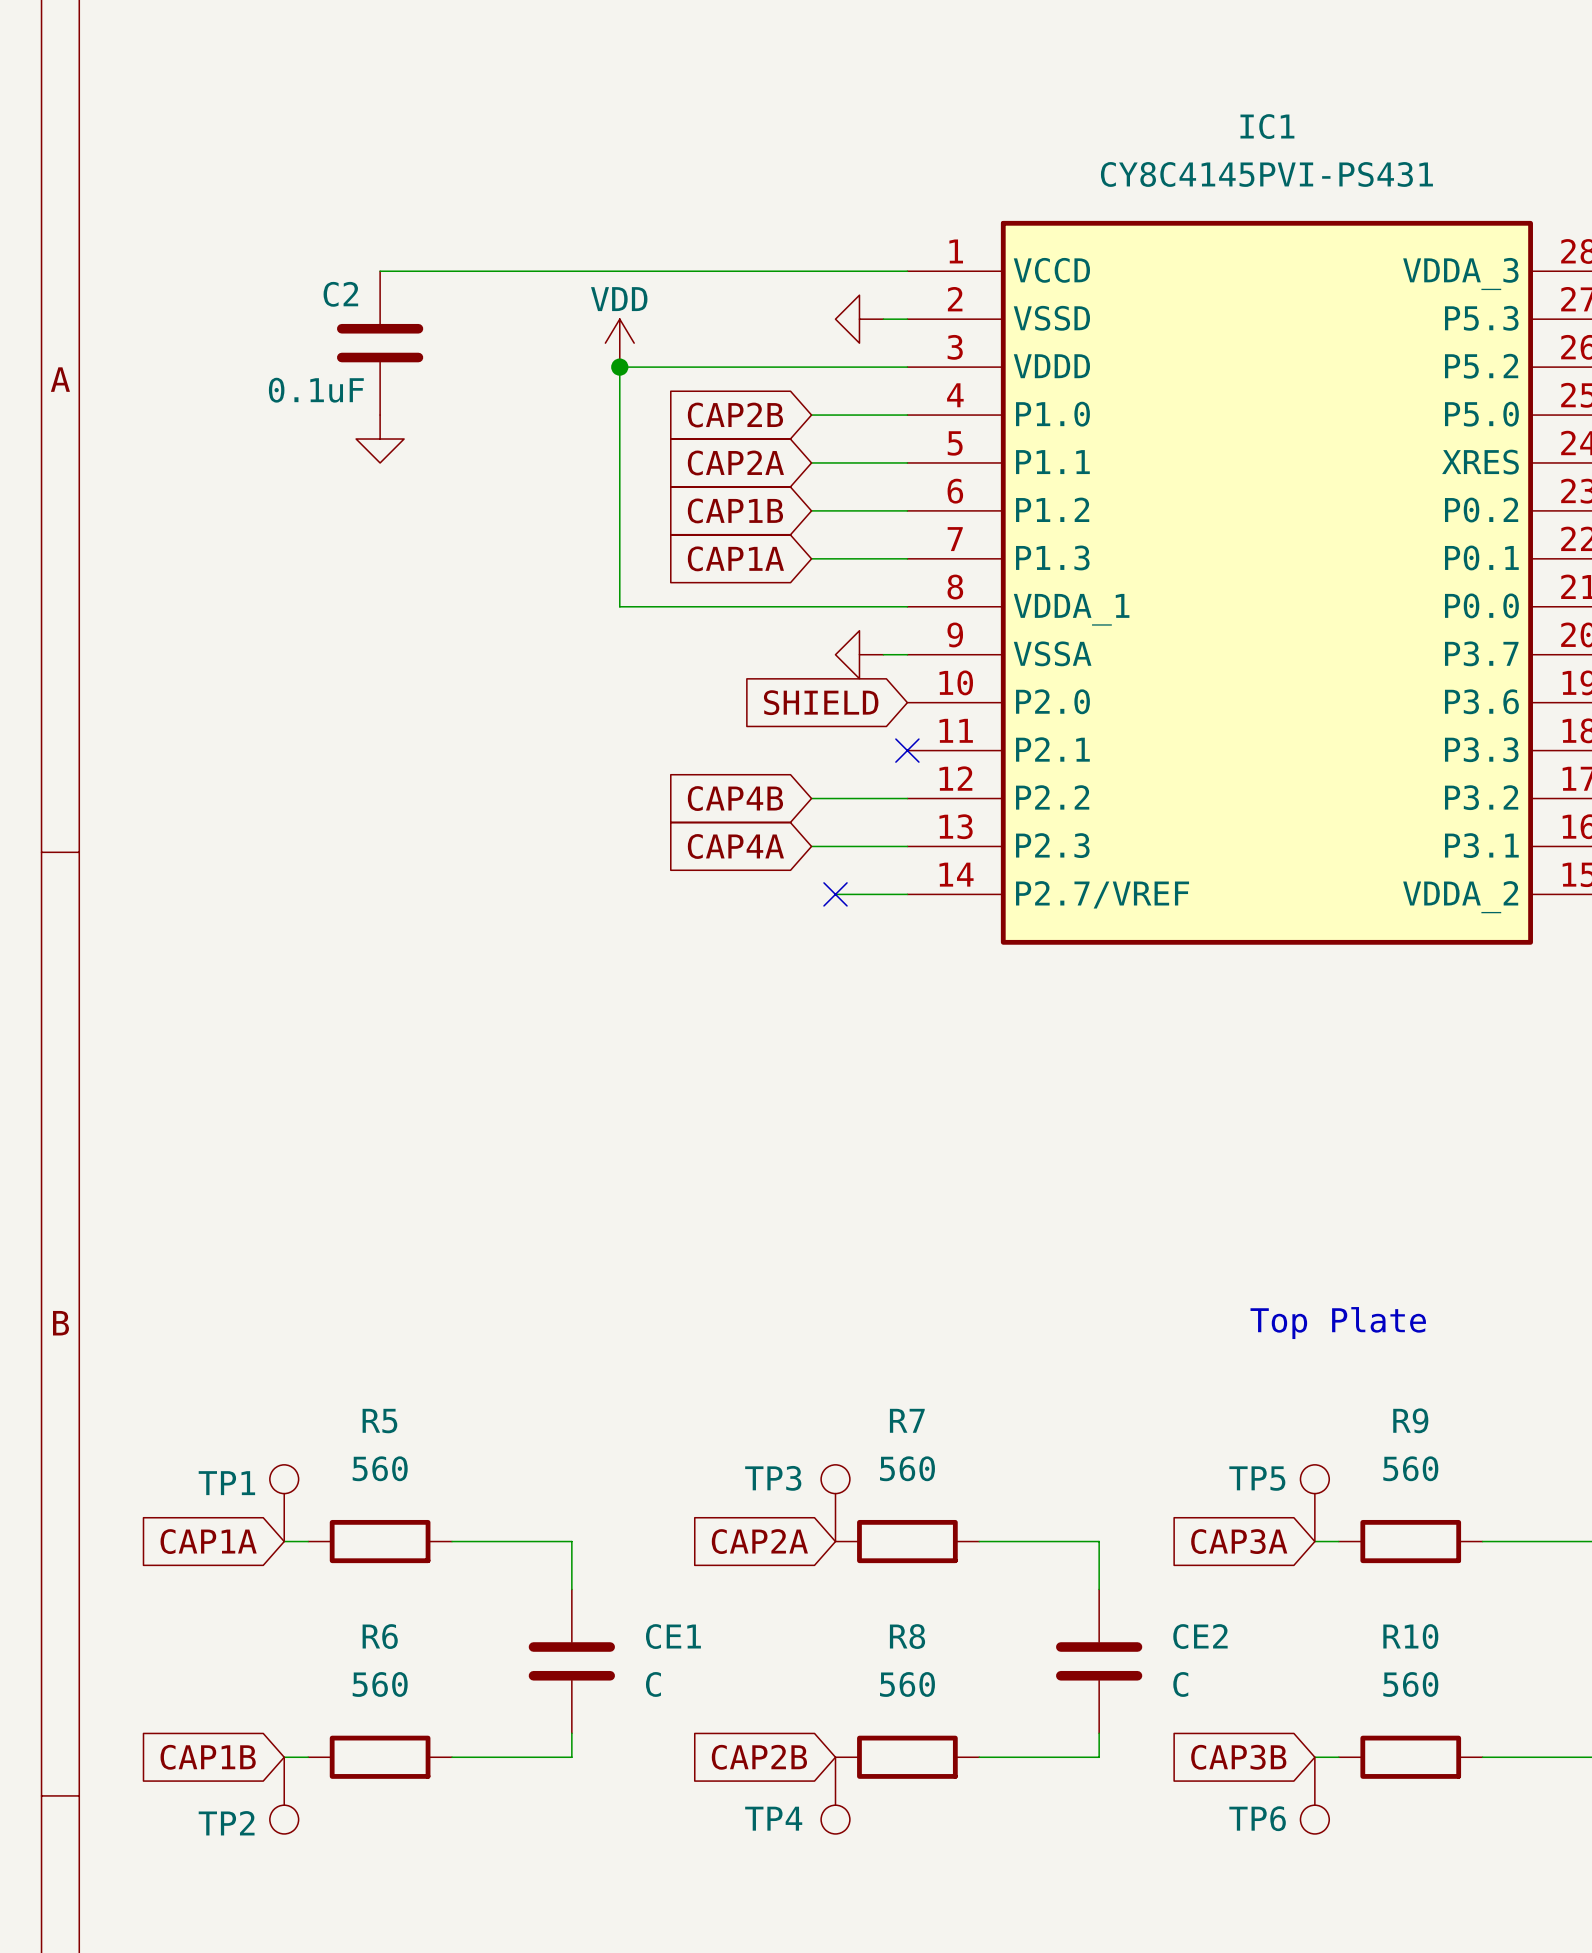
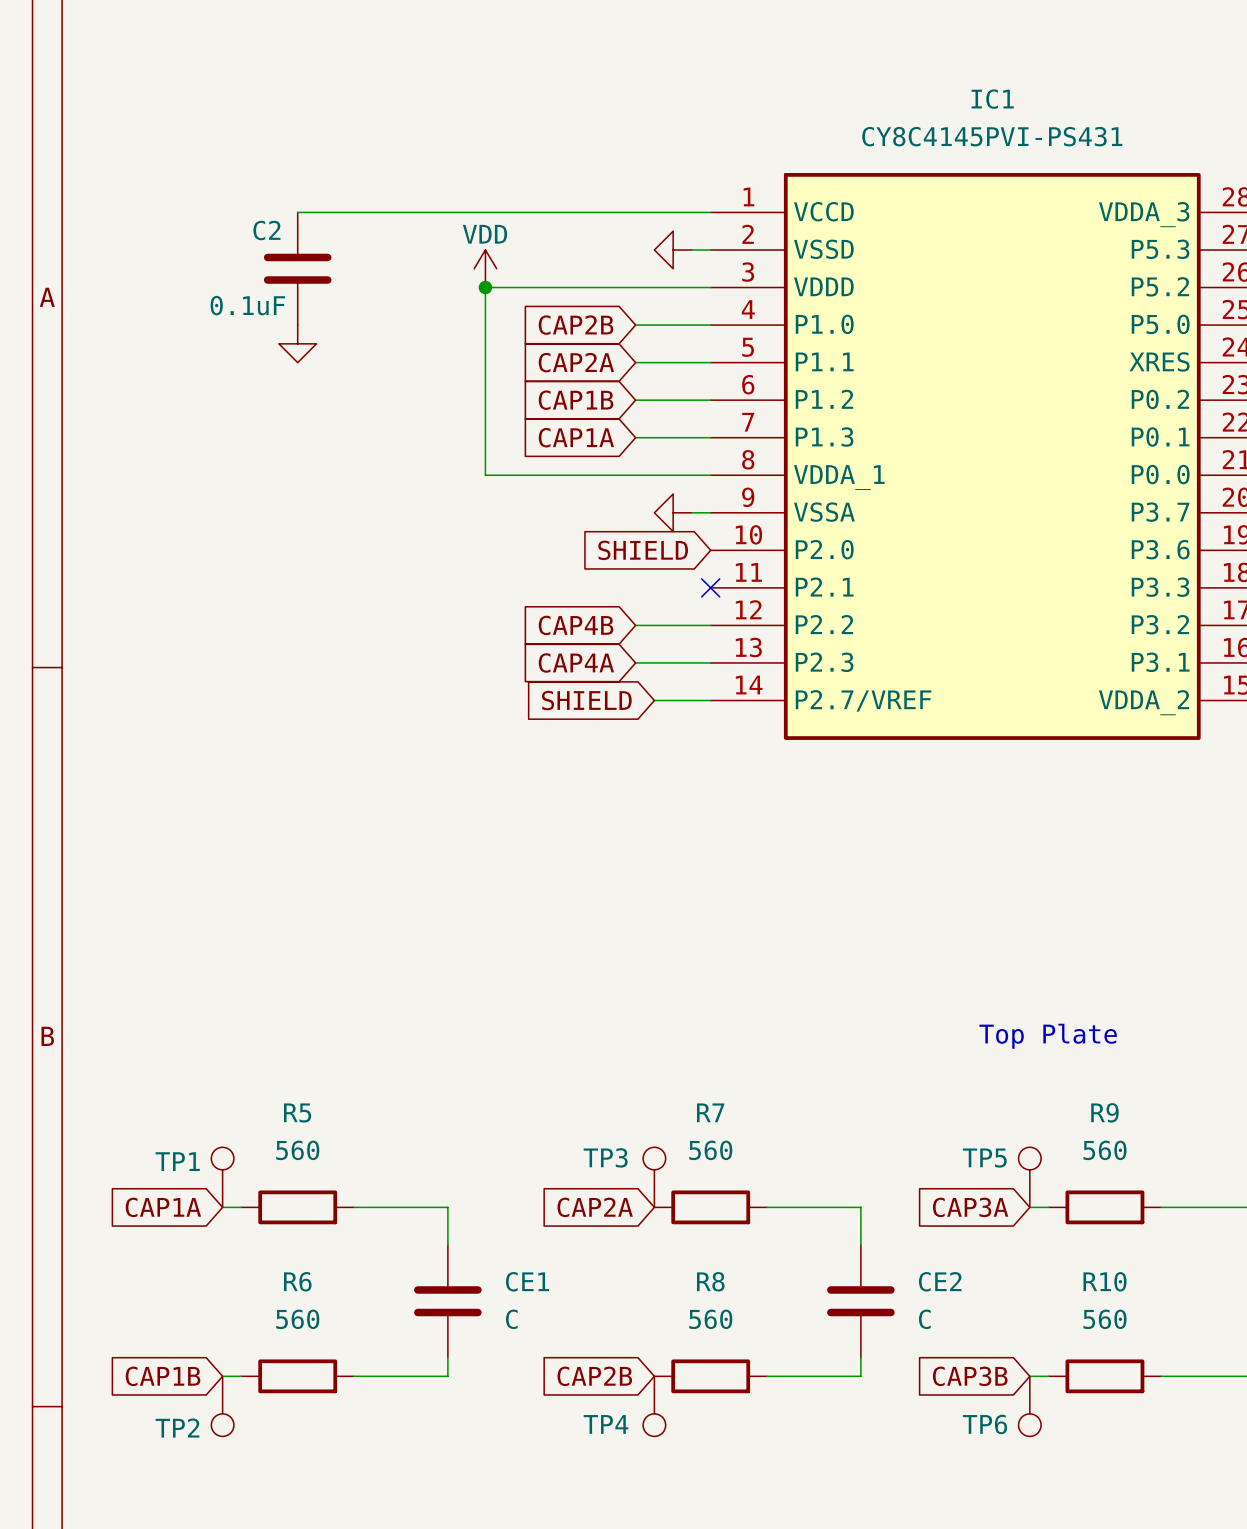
global label: none -> SHIELD (586, 700)
no-connect mark: (835, 894) -> none

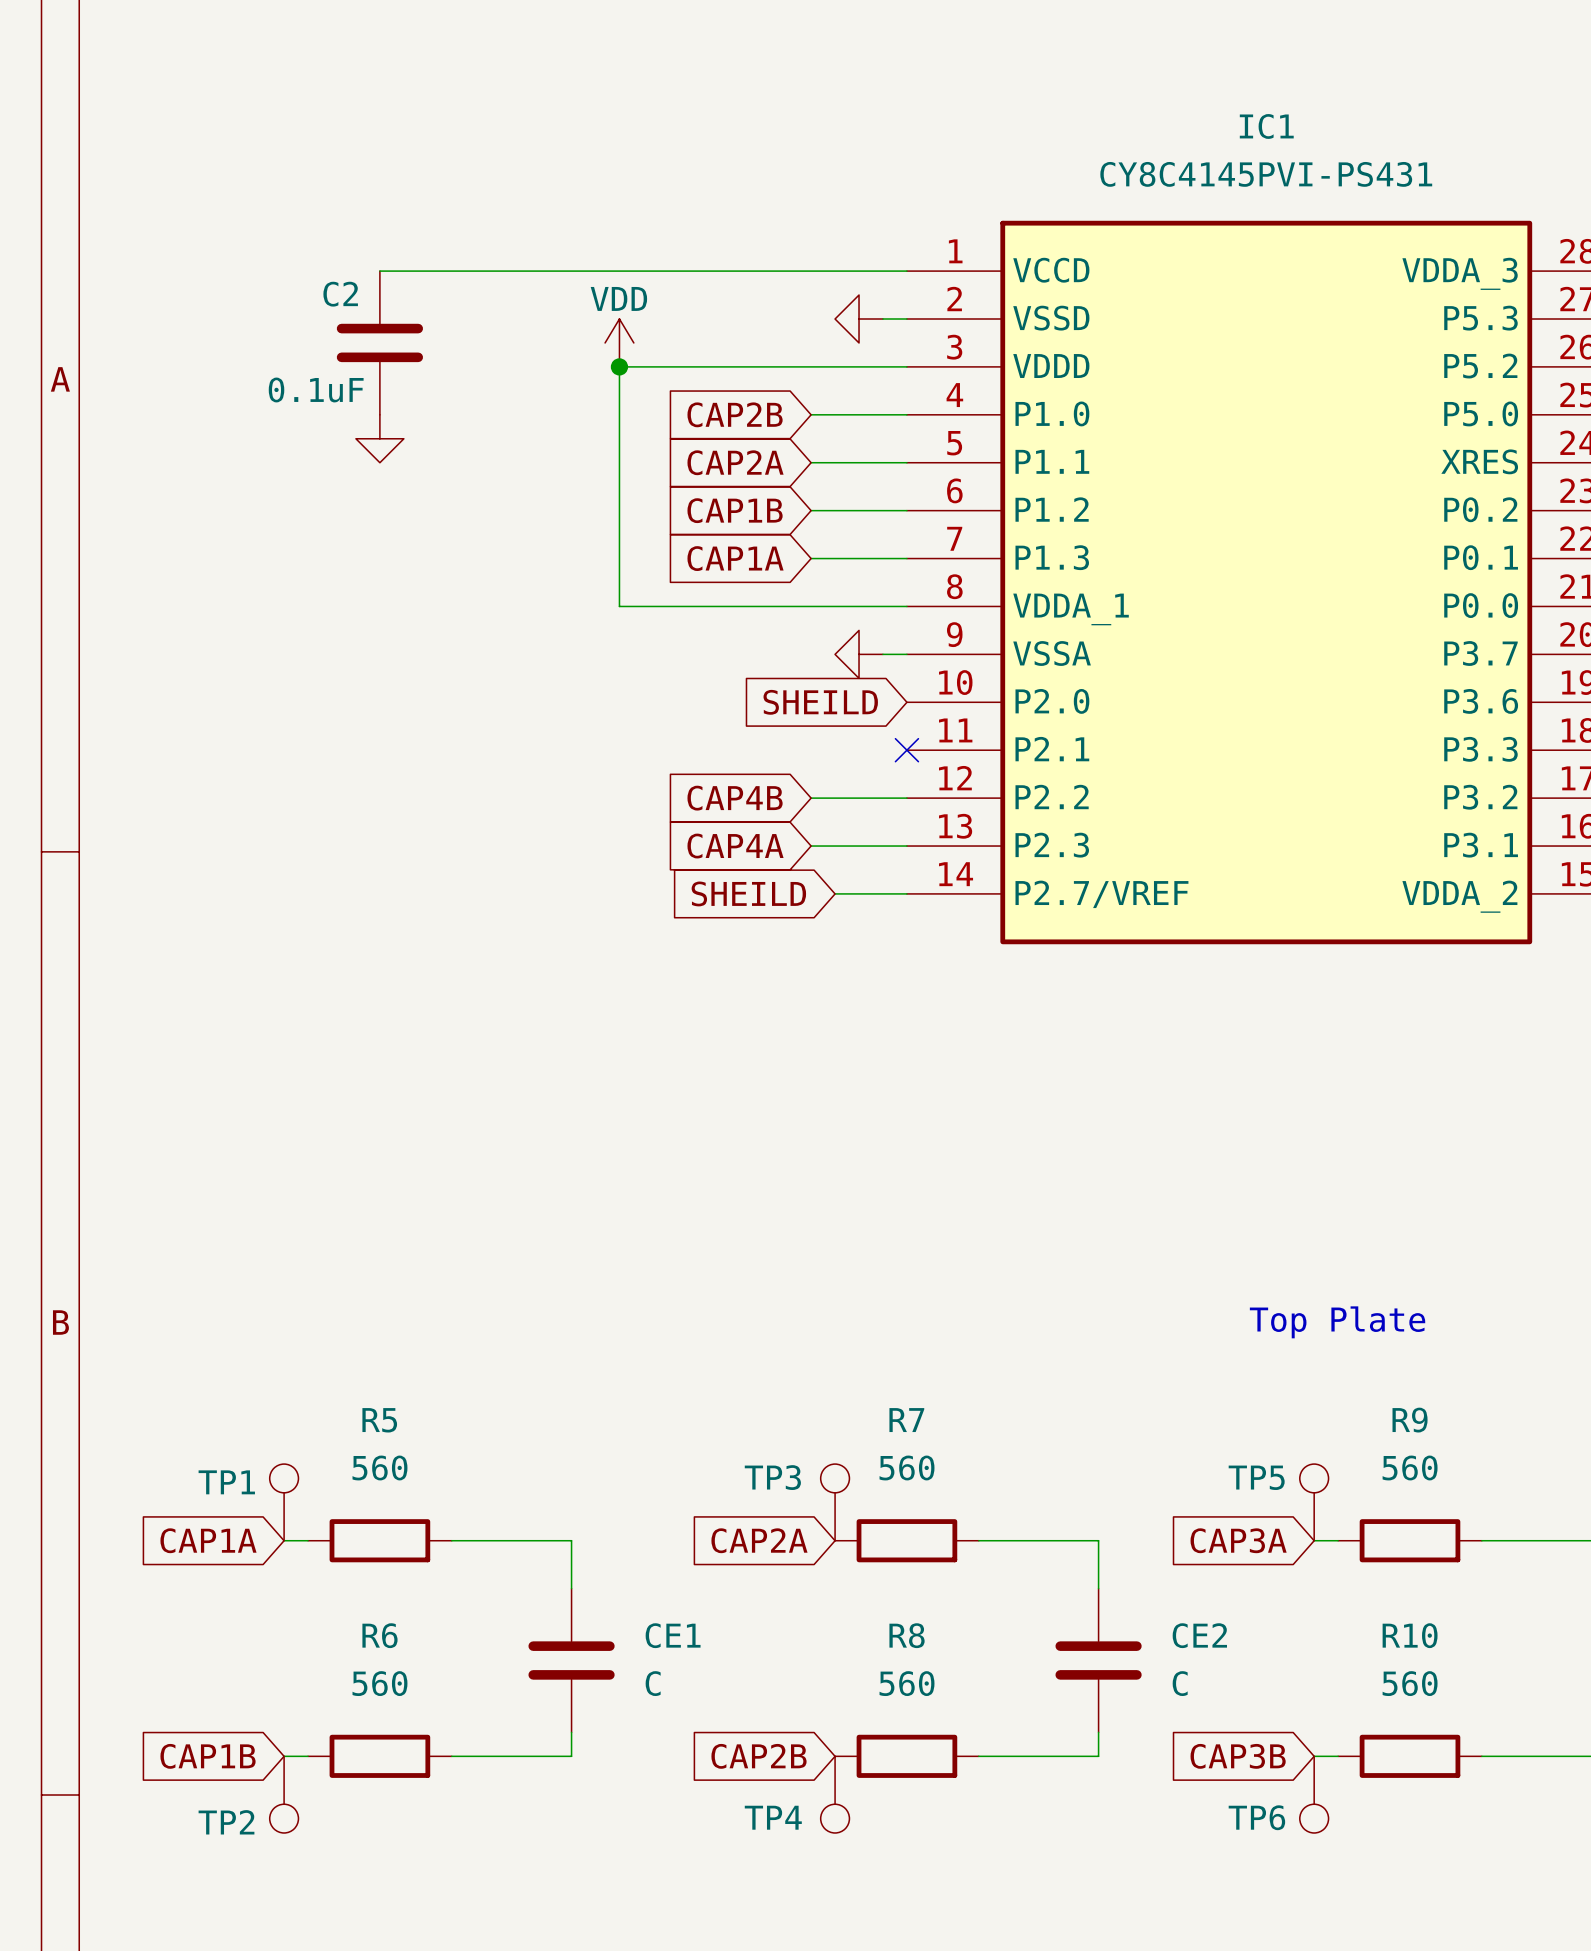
global label: SHIELD (643, 550) -> SHEILD (820, 702)
global label: SHIELD (586, 700) -> SHEILD (748, 893)

